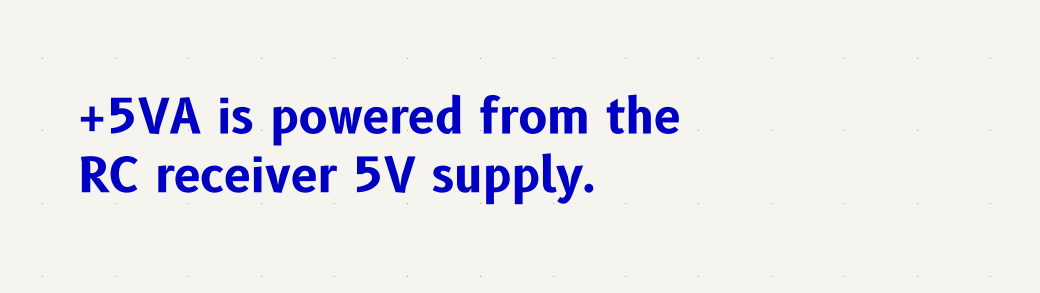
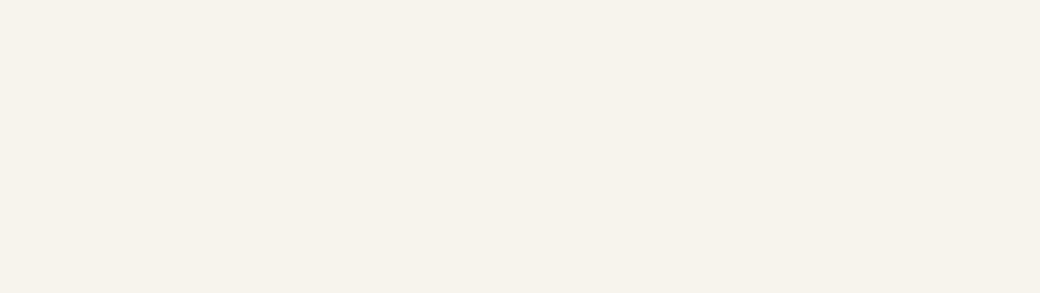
text: +5VA is powered from the (379, 120) -> none
text: RC receiver 5V supply. (337, 178) -> none

